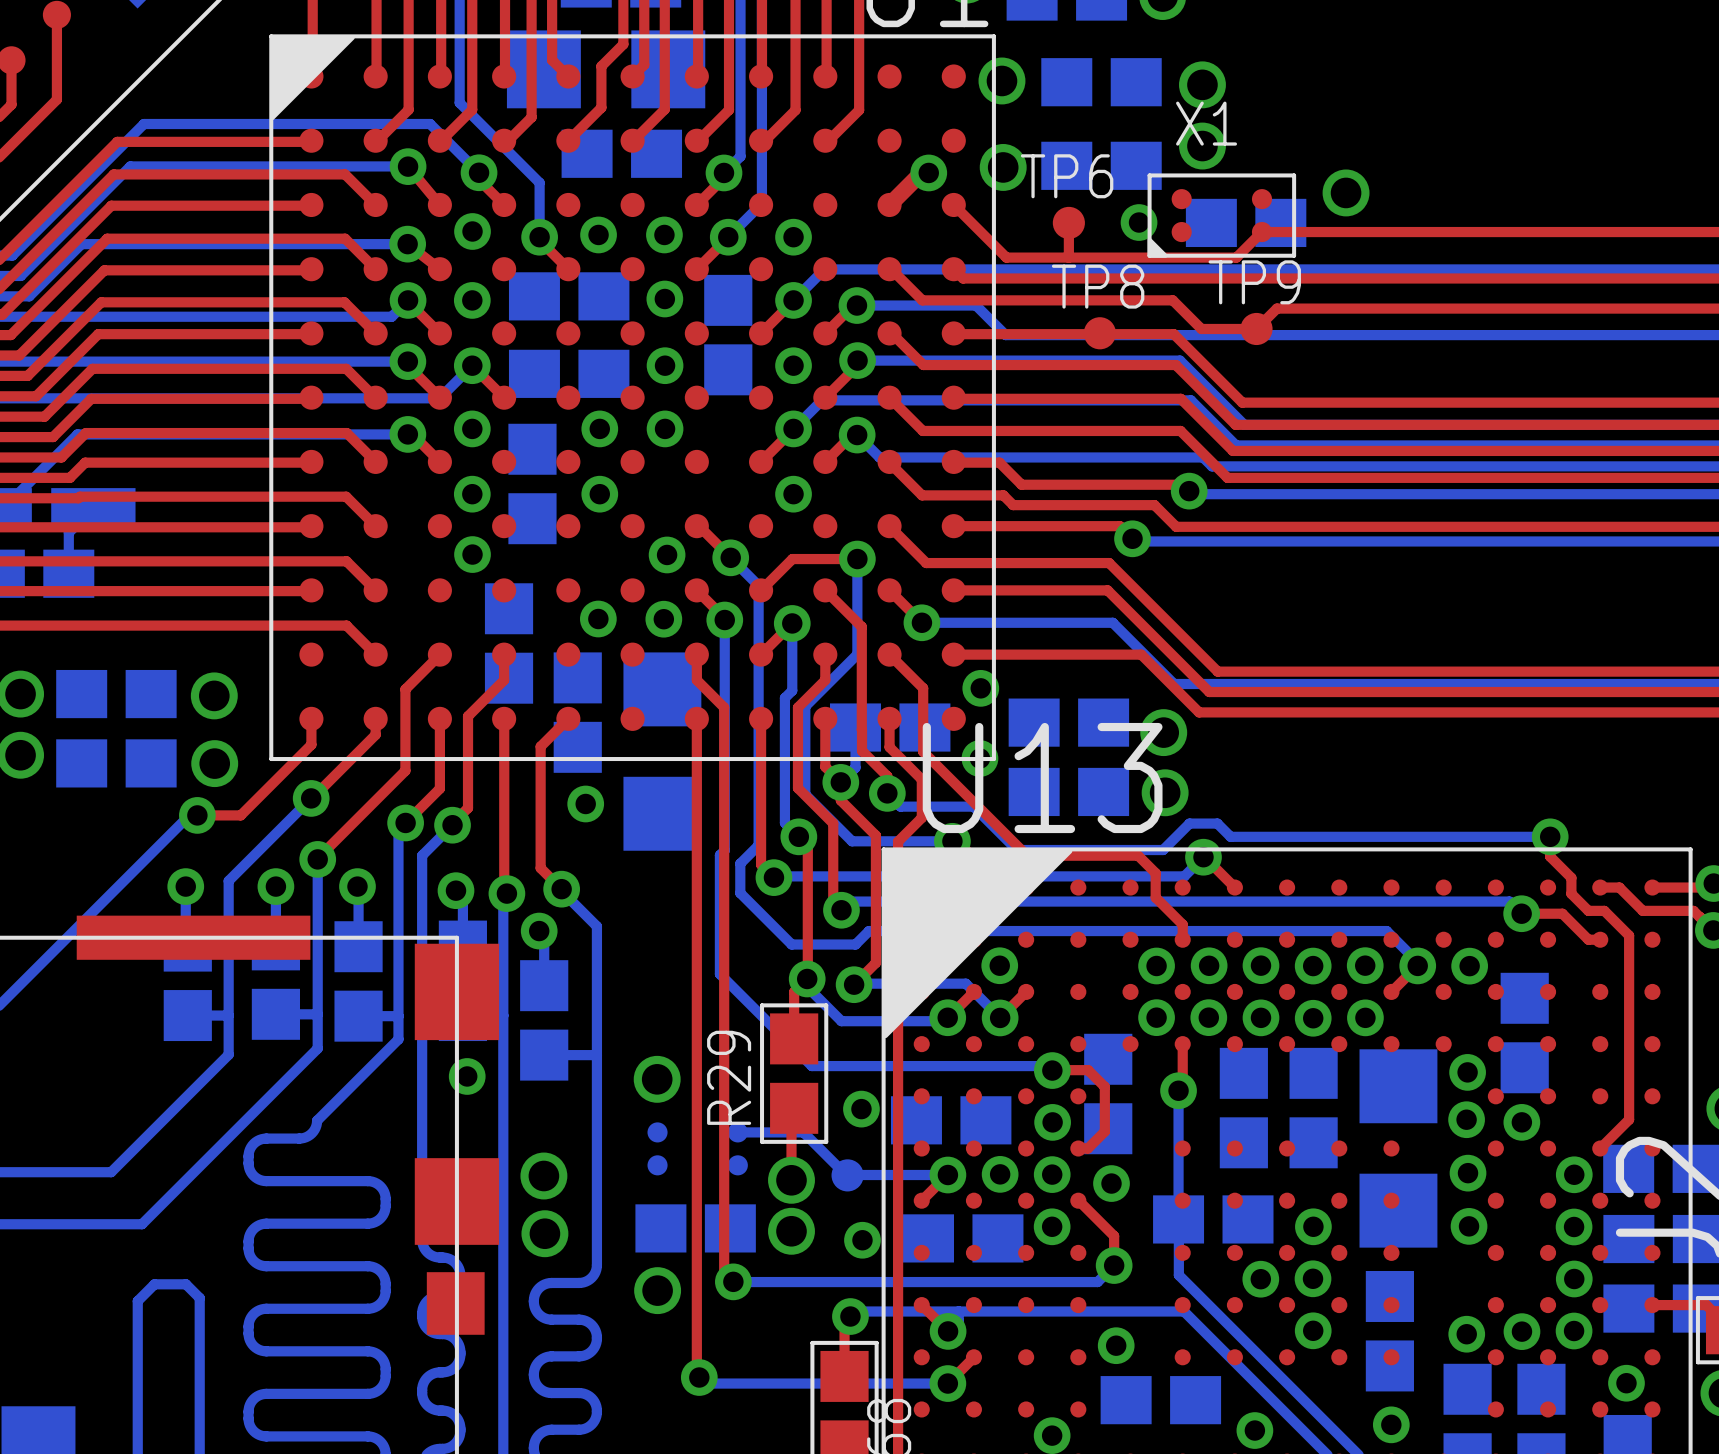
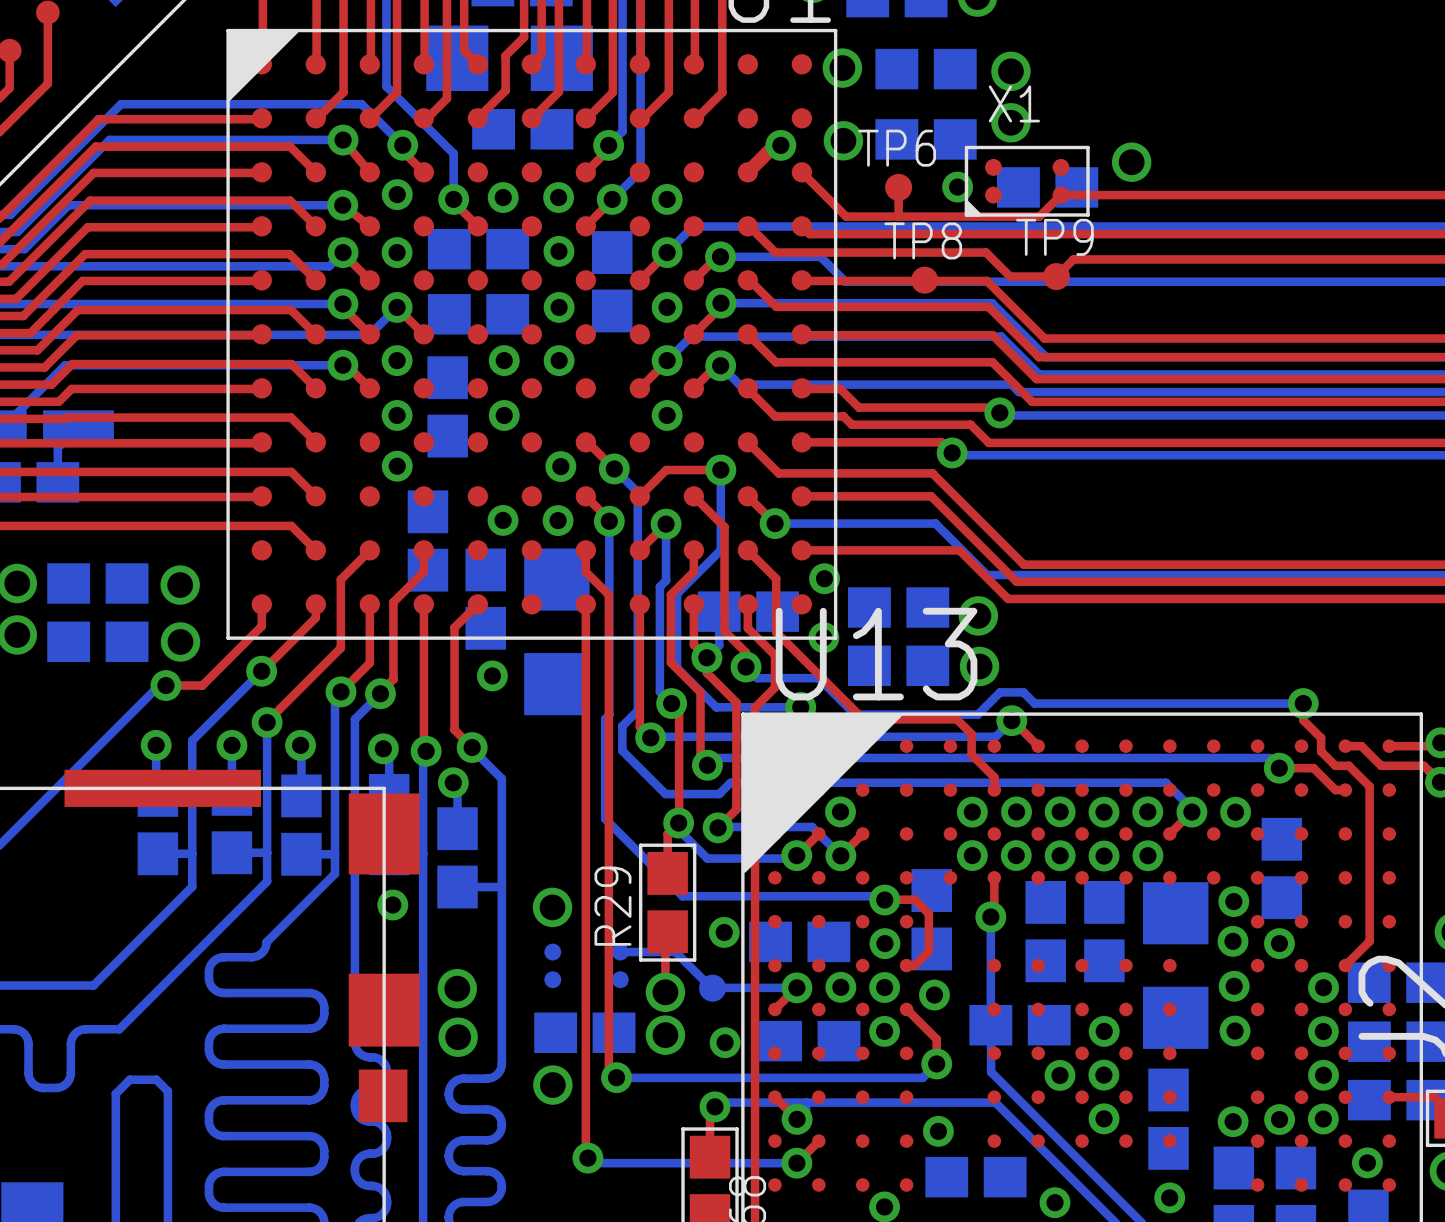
bottom track: (16, 1224) (102, 1224) -> (13, 1029) (21, 1031) (26, 1036) (28, 1044) (29, 1076) (34, 1084) (43, 1087) (59, 1087) (67, 1082) (70, 1074) (72, 1038) (78, 1031) (85, 1029)

